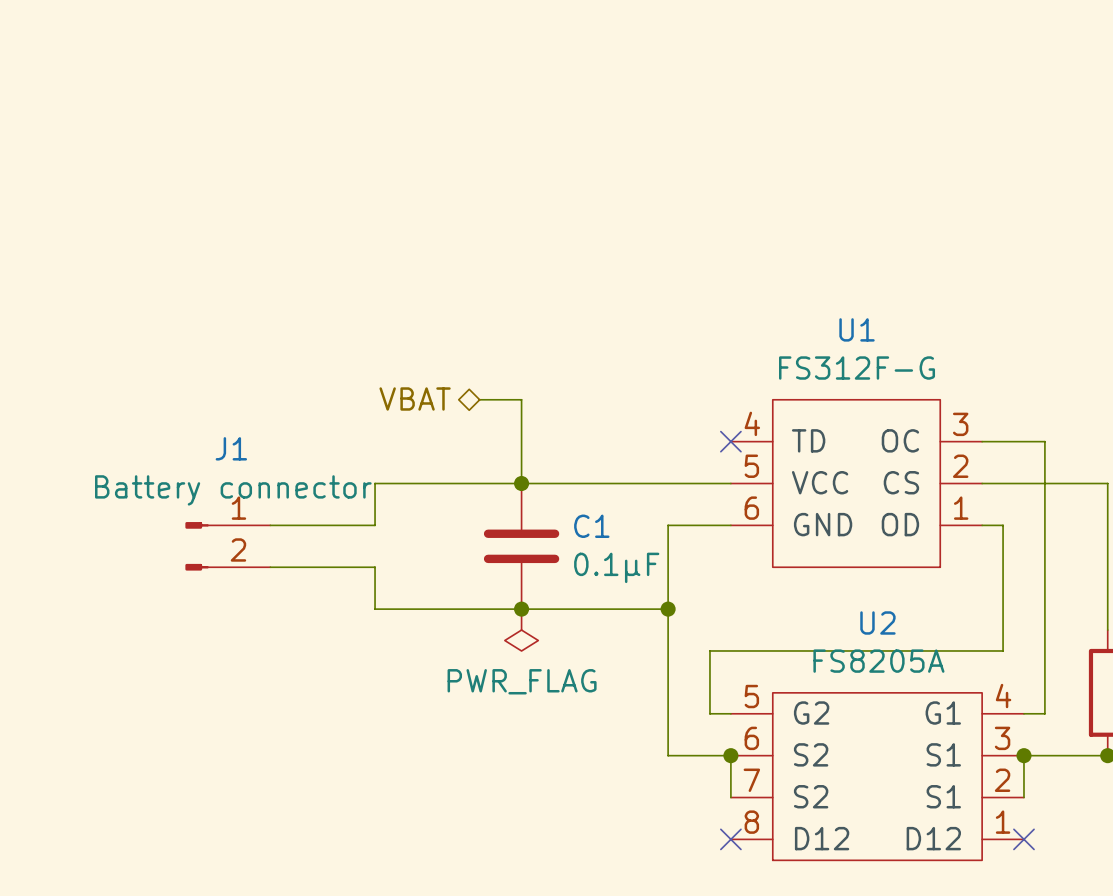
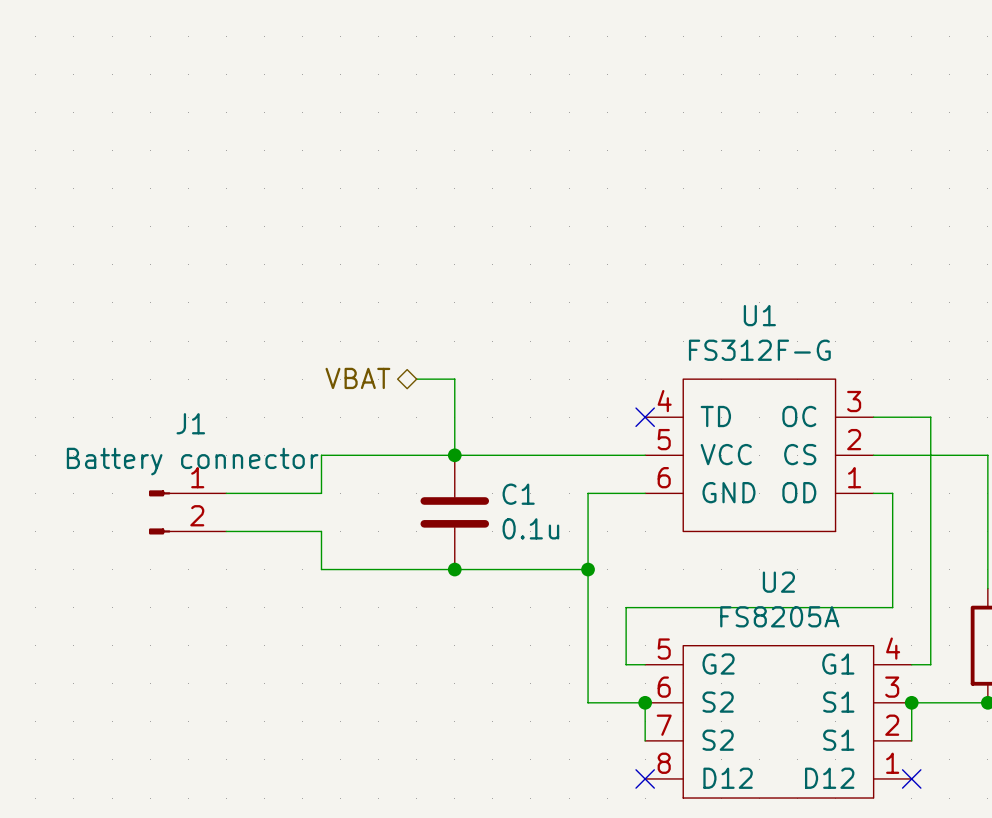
C1 value: 0.1µF (616, 567) -> 0.1u (530, 528)
power symbol: PWR_FLAG (521, 630) -> none

